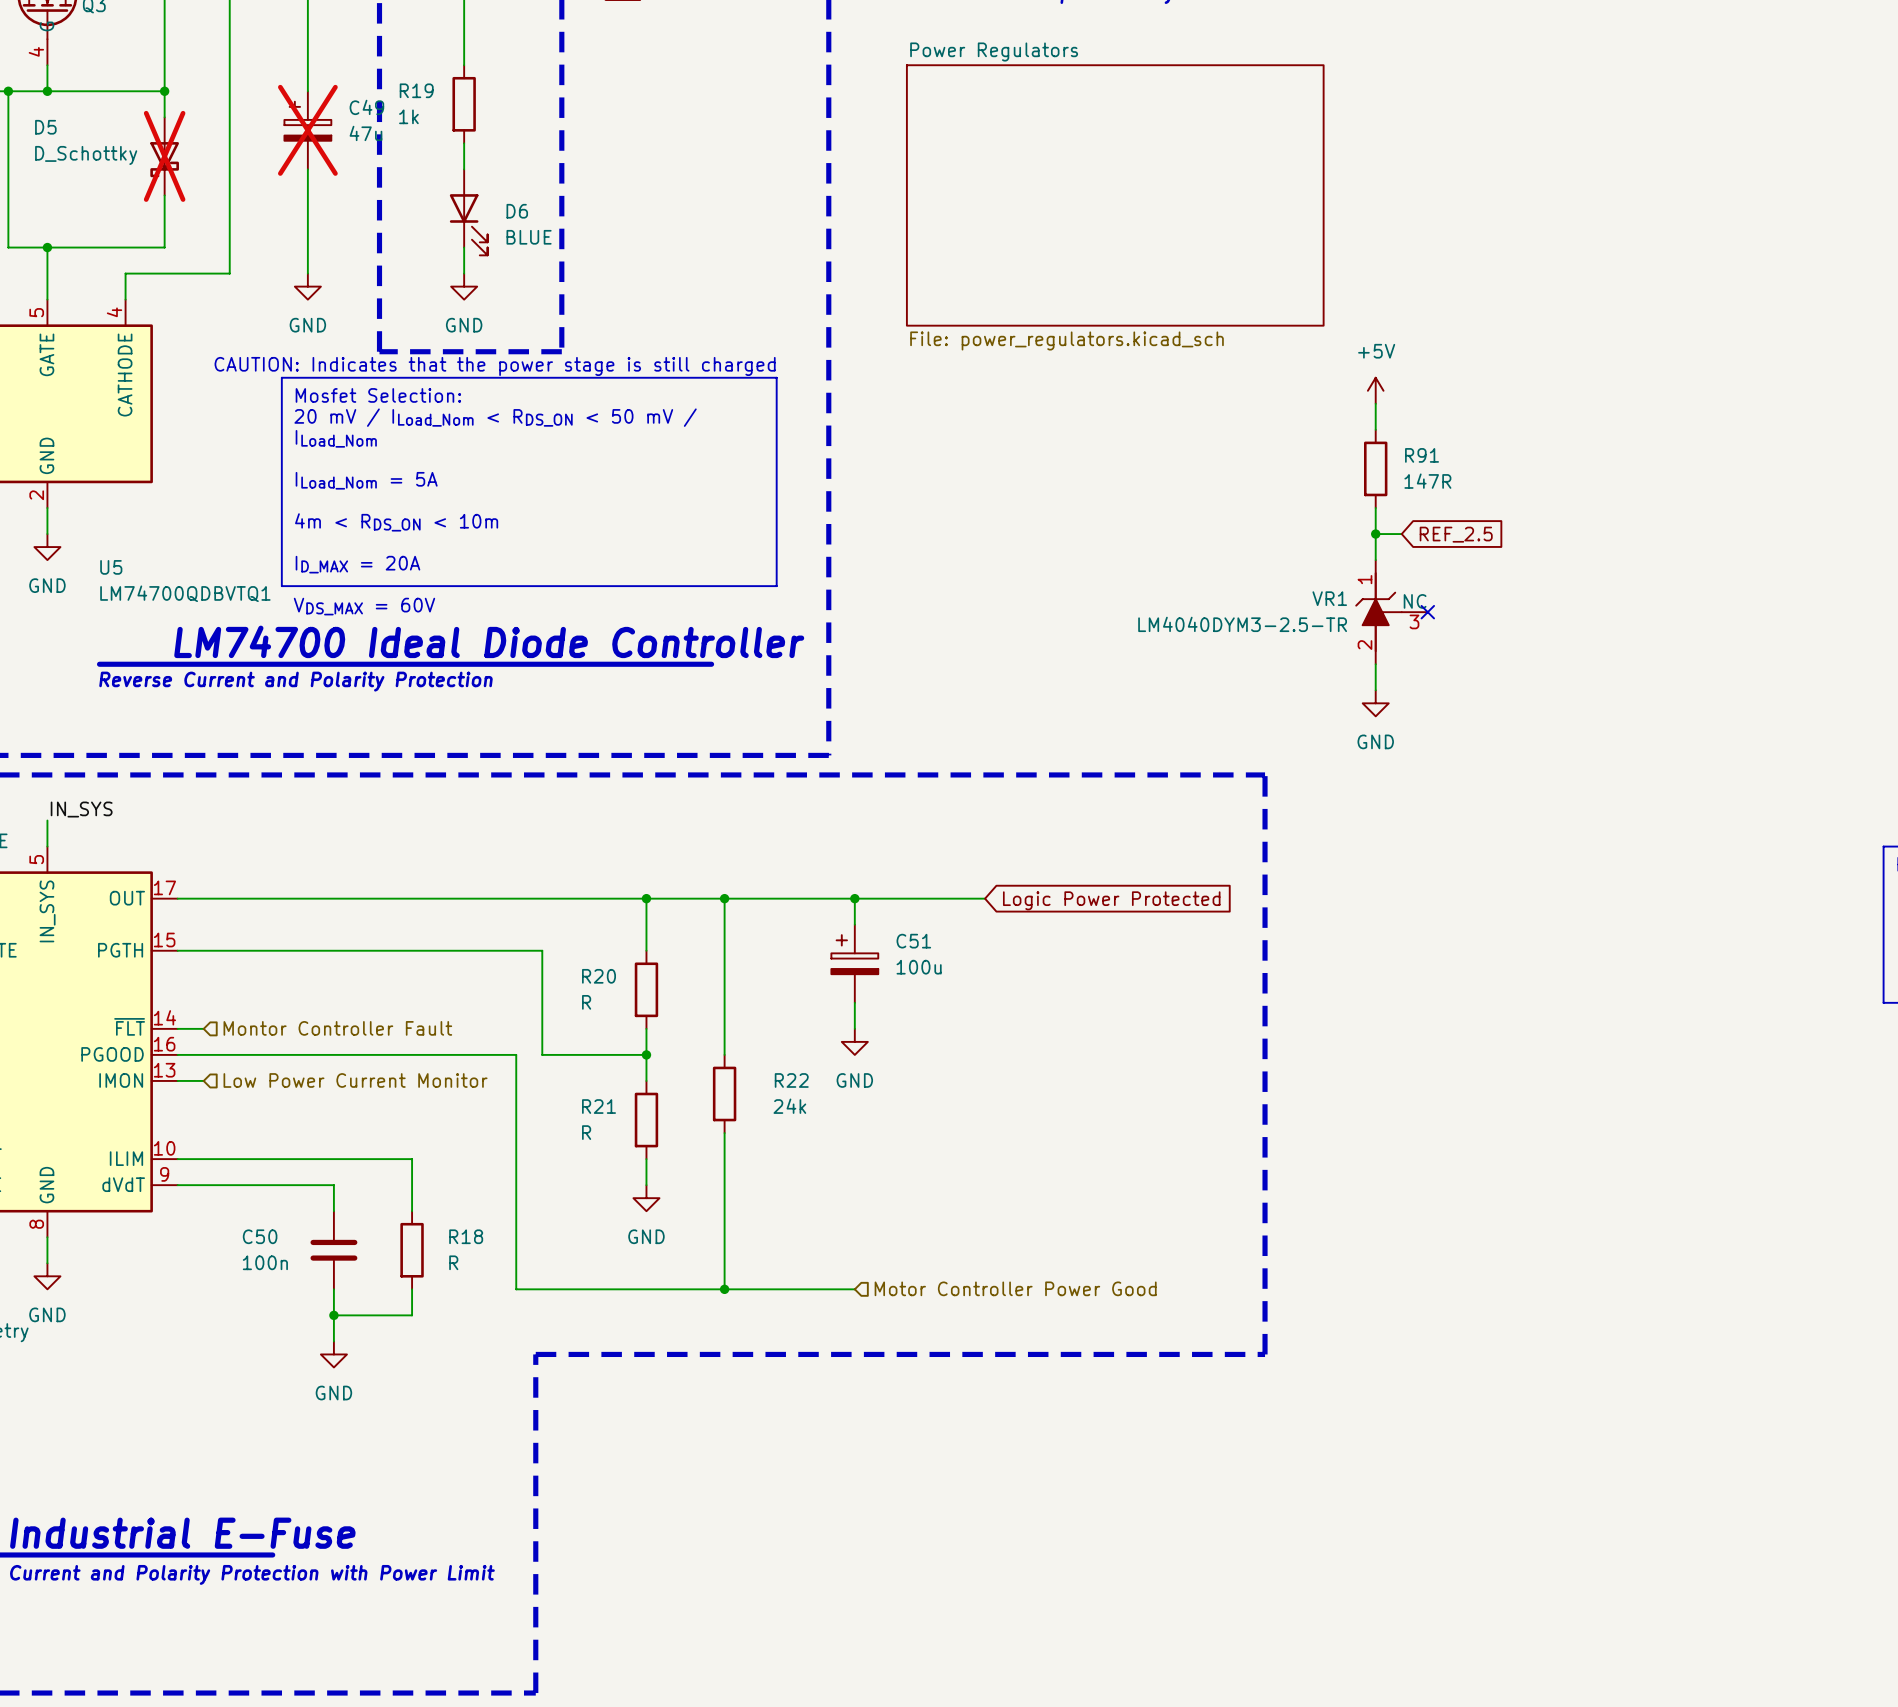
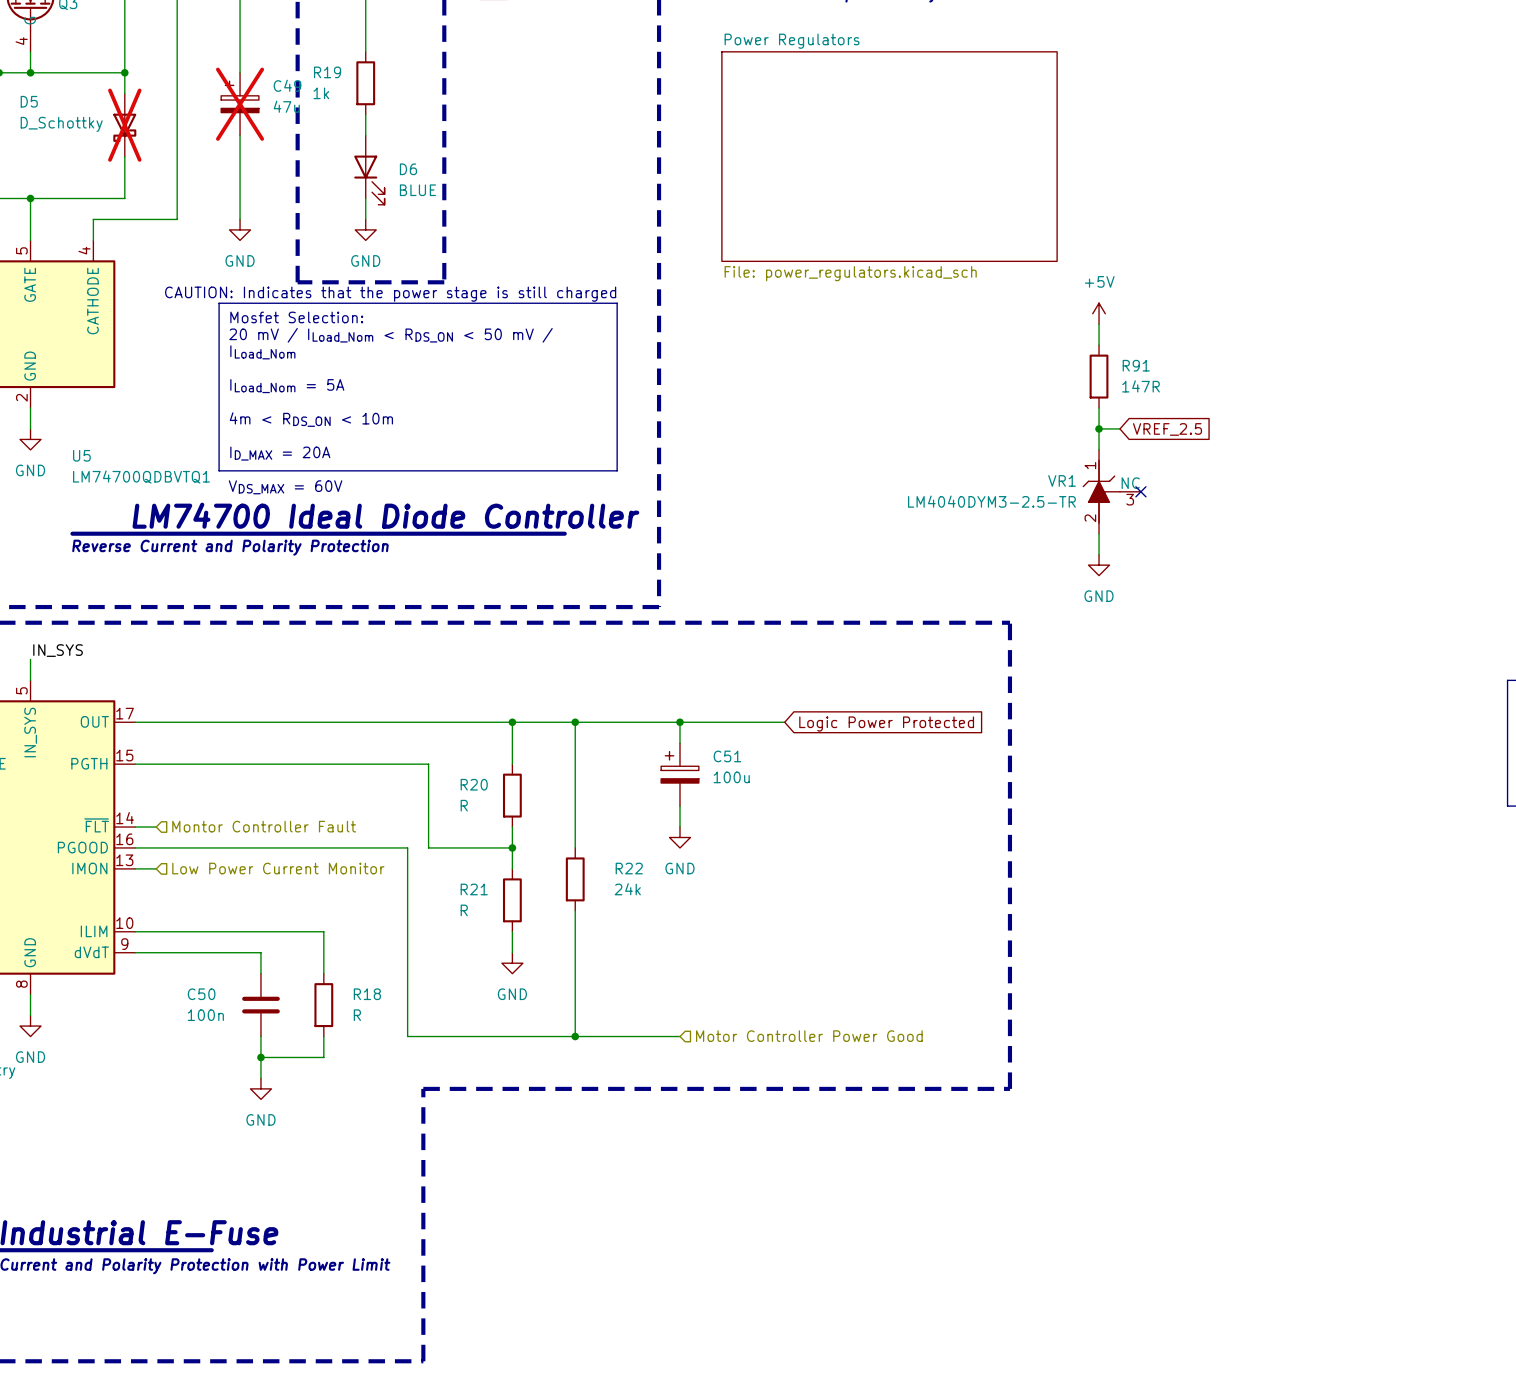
global label: REF_2.5 (1456, 534) -> VREF_2.5 (1167, 429)

